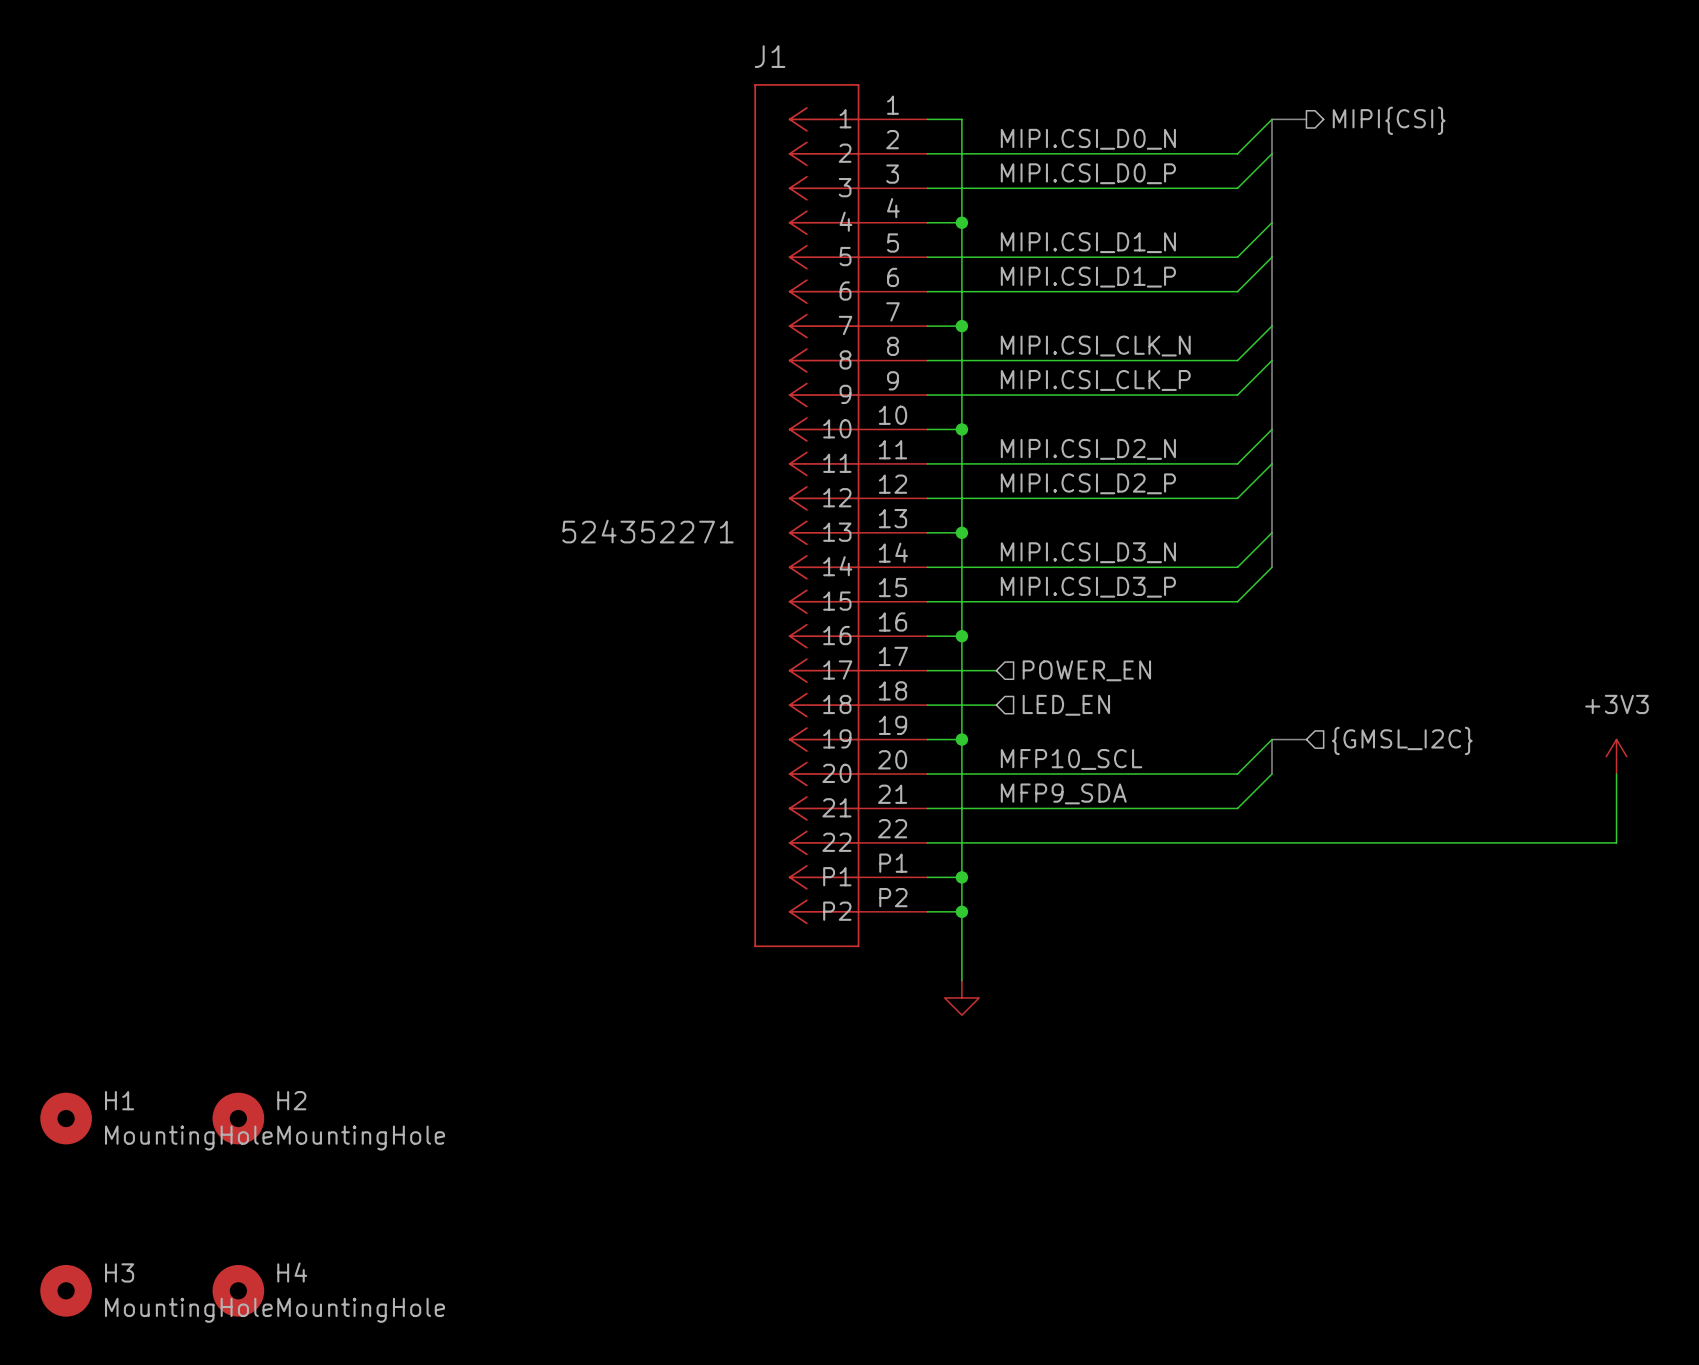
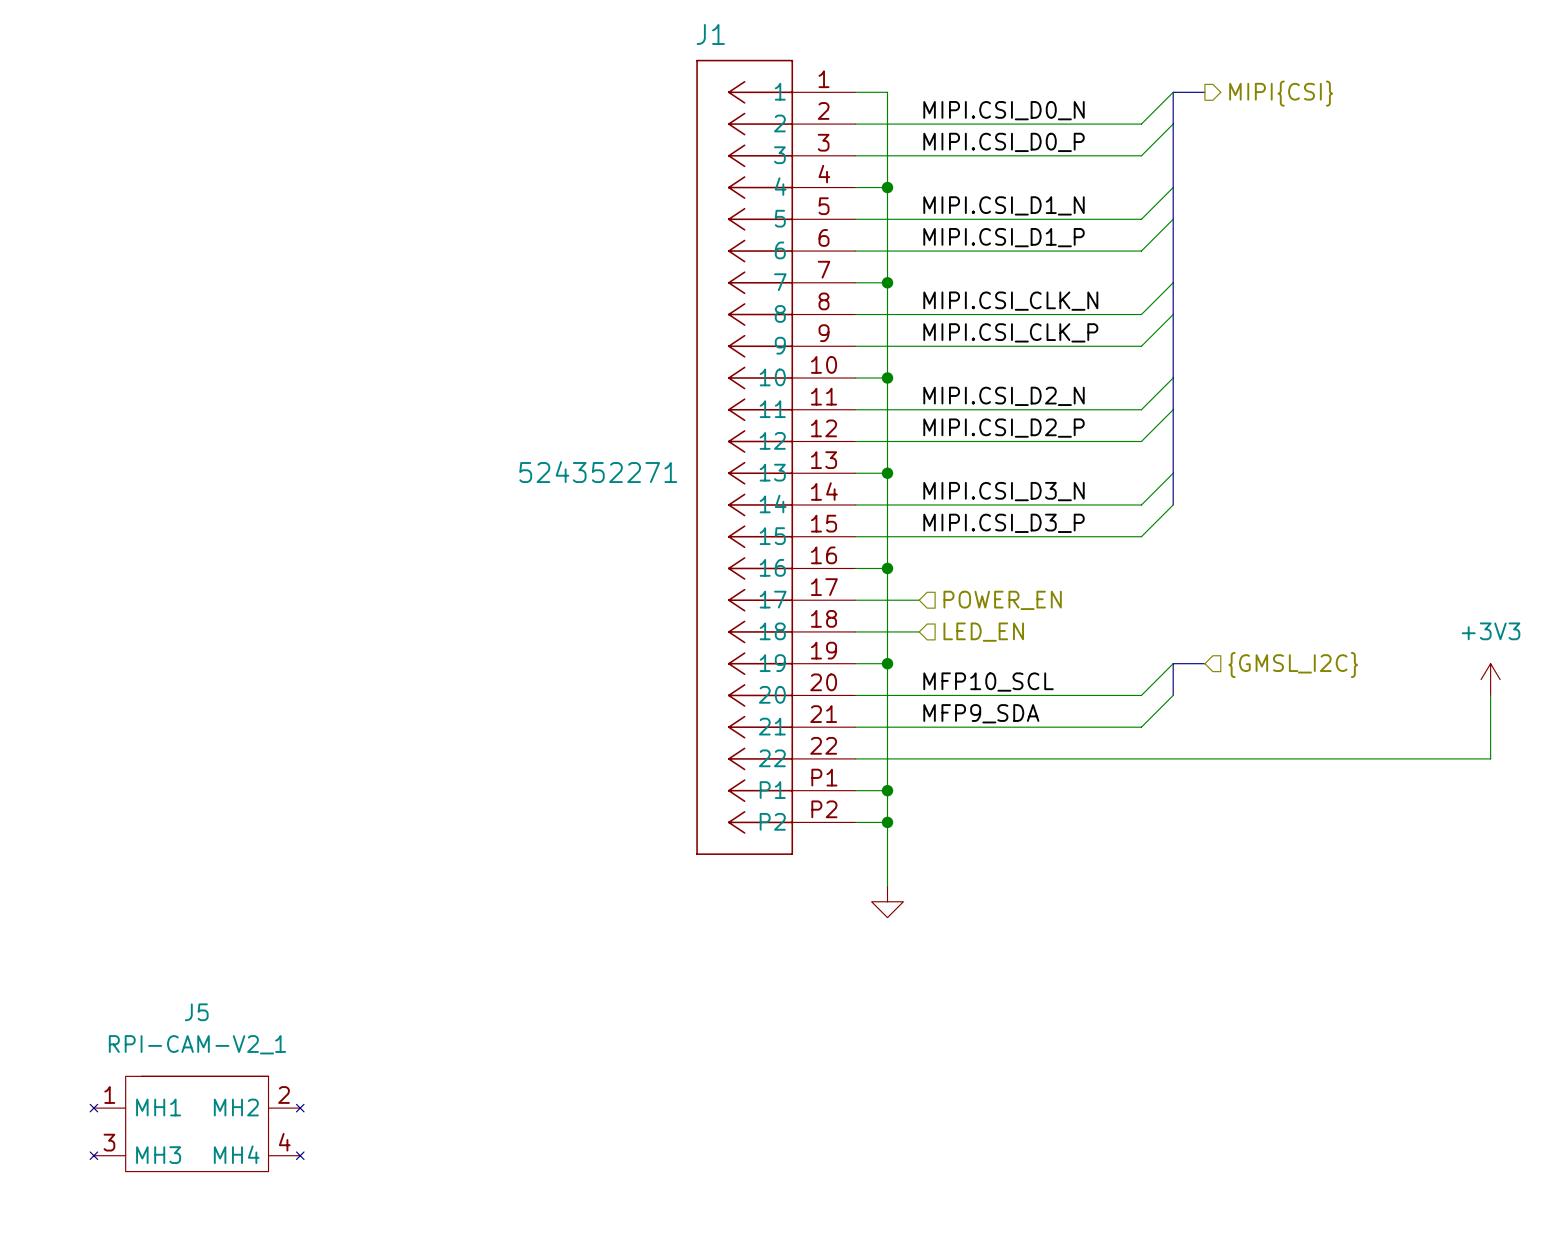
H1: MountingHole (66, 1118) -> none
H2: MountingHole (238, 1118) -> none
J5: none -> RPI-CAM-V2_1 (197, 1123)
H3: MountingHole (66, 1290) -> none
H4: MountingHole (238, 1290) -> none

